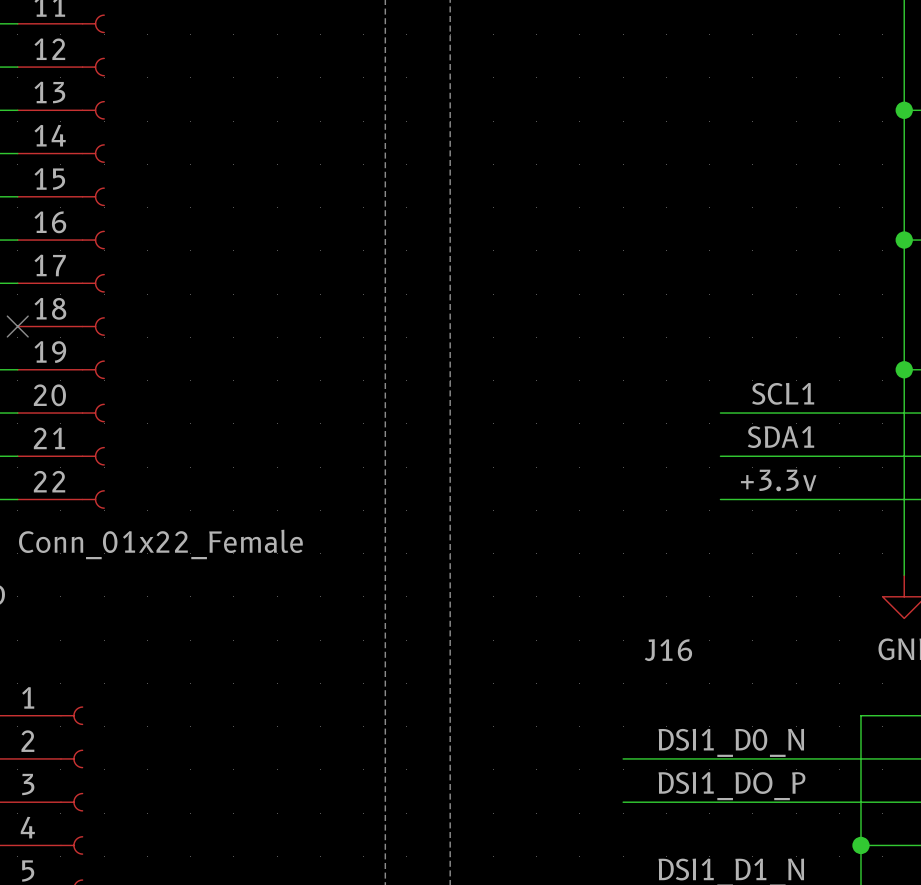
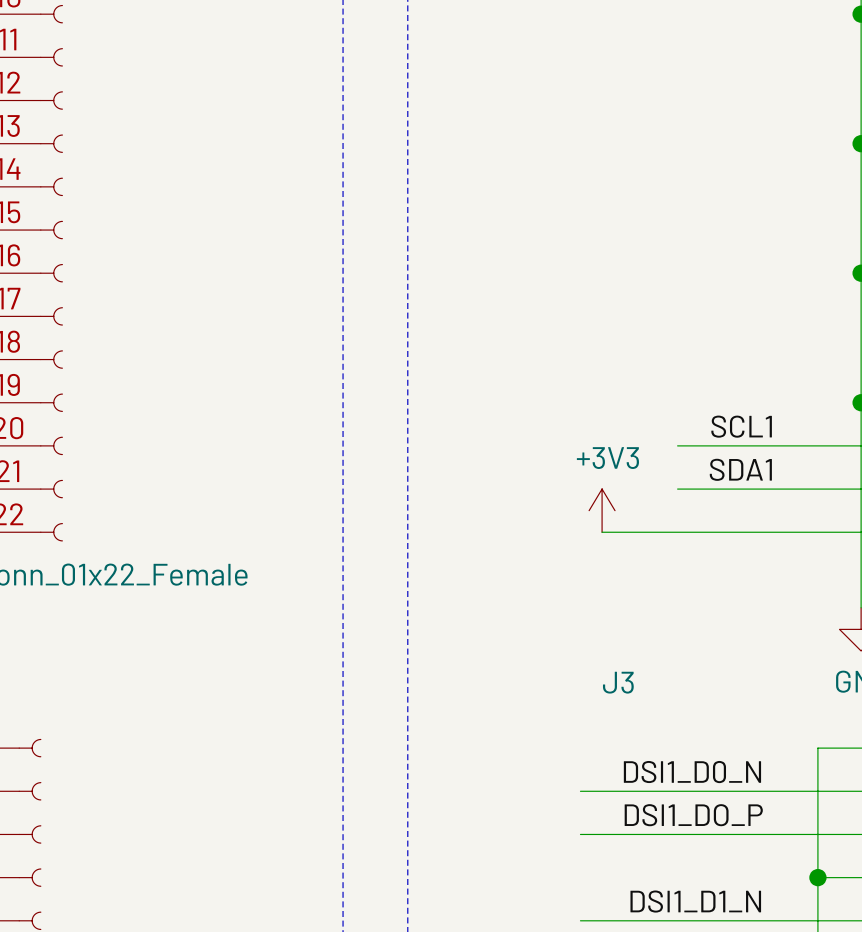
power symbol: none -> +3V3 (602, 510)
label: +3.3v (778, 480) -> none
wire: none -> (602, 532) (677, 532)
J16 name: J16 (668, 650) -> J3 (618, 682)

